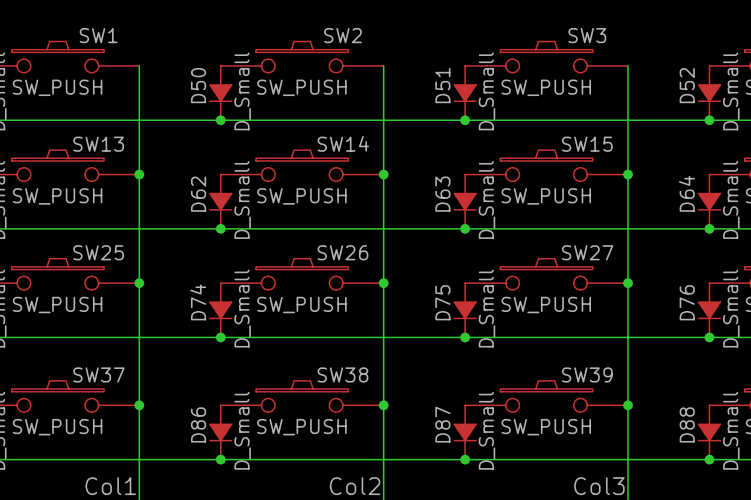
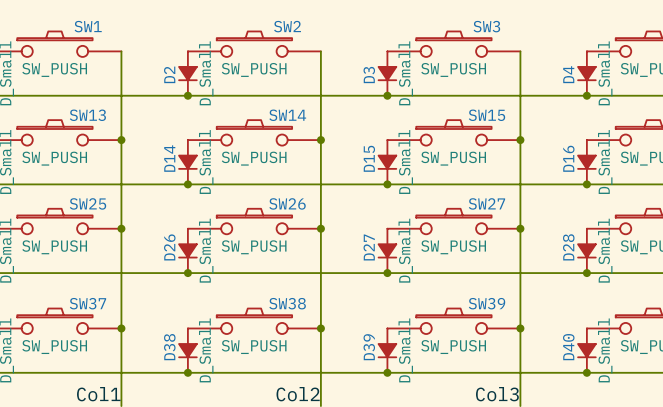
D50 name: D50 (198, 85) -> D2 (169, 74)
D51 name: D51 (442, 85) -> D3 (369, 75)
D52 name: D52 (687, 85) -> D4 (568, 74)
D64 name: D64 (686, 193) -> D16 (568, 158)
D62 name: D62 (198, 194) -> D14 (169, 158)
D63 name: D63 (442, 194) -> D15 (369, 158)
D74 name: D74 (198, 302) -> D26 (169, 247)
D75 name: D75 (442, 302) -> D27 (369, 247)
D76 name: D76 (687, 302) -> D28 (568, 247)
D86 name: D86 (198, 424) -> D38 (169, 347)
D87 name: D87 (442, 424) -> D39 (369, 347)
D88 name: D88 (687, 424) -> D40 (568, 347)

